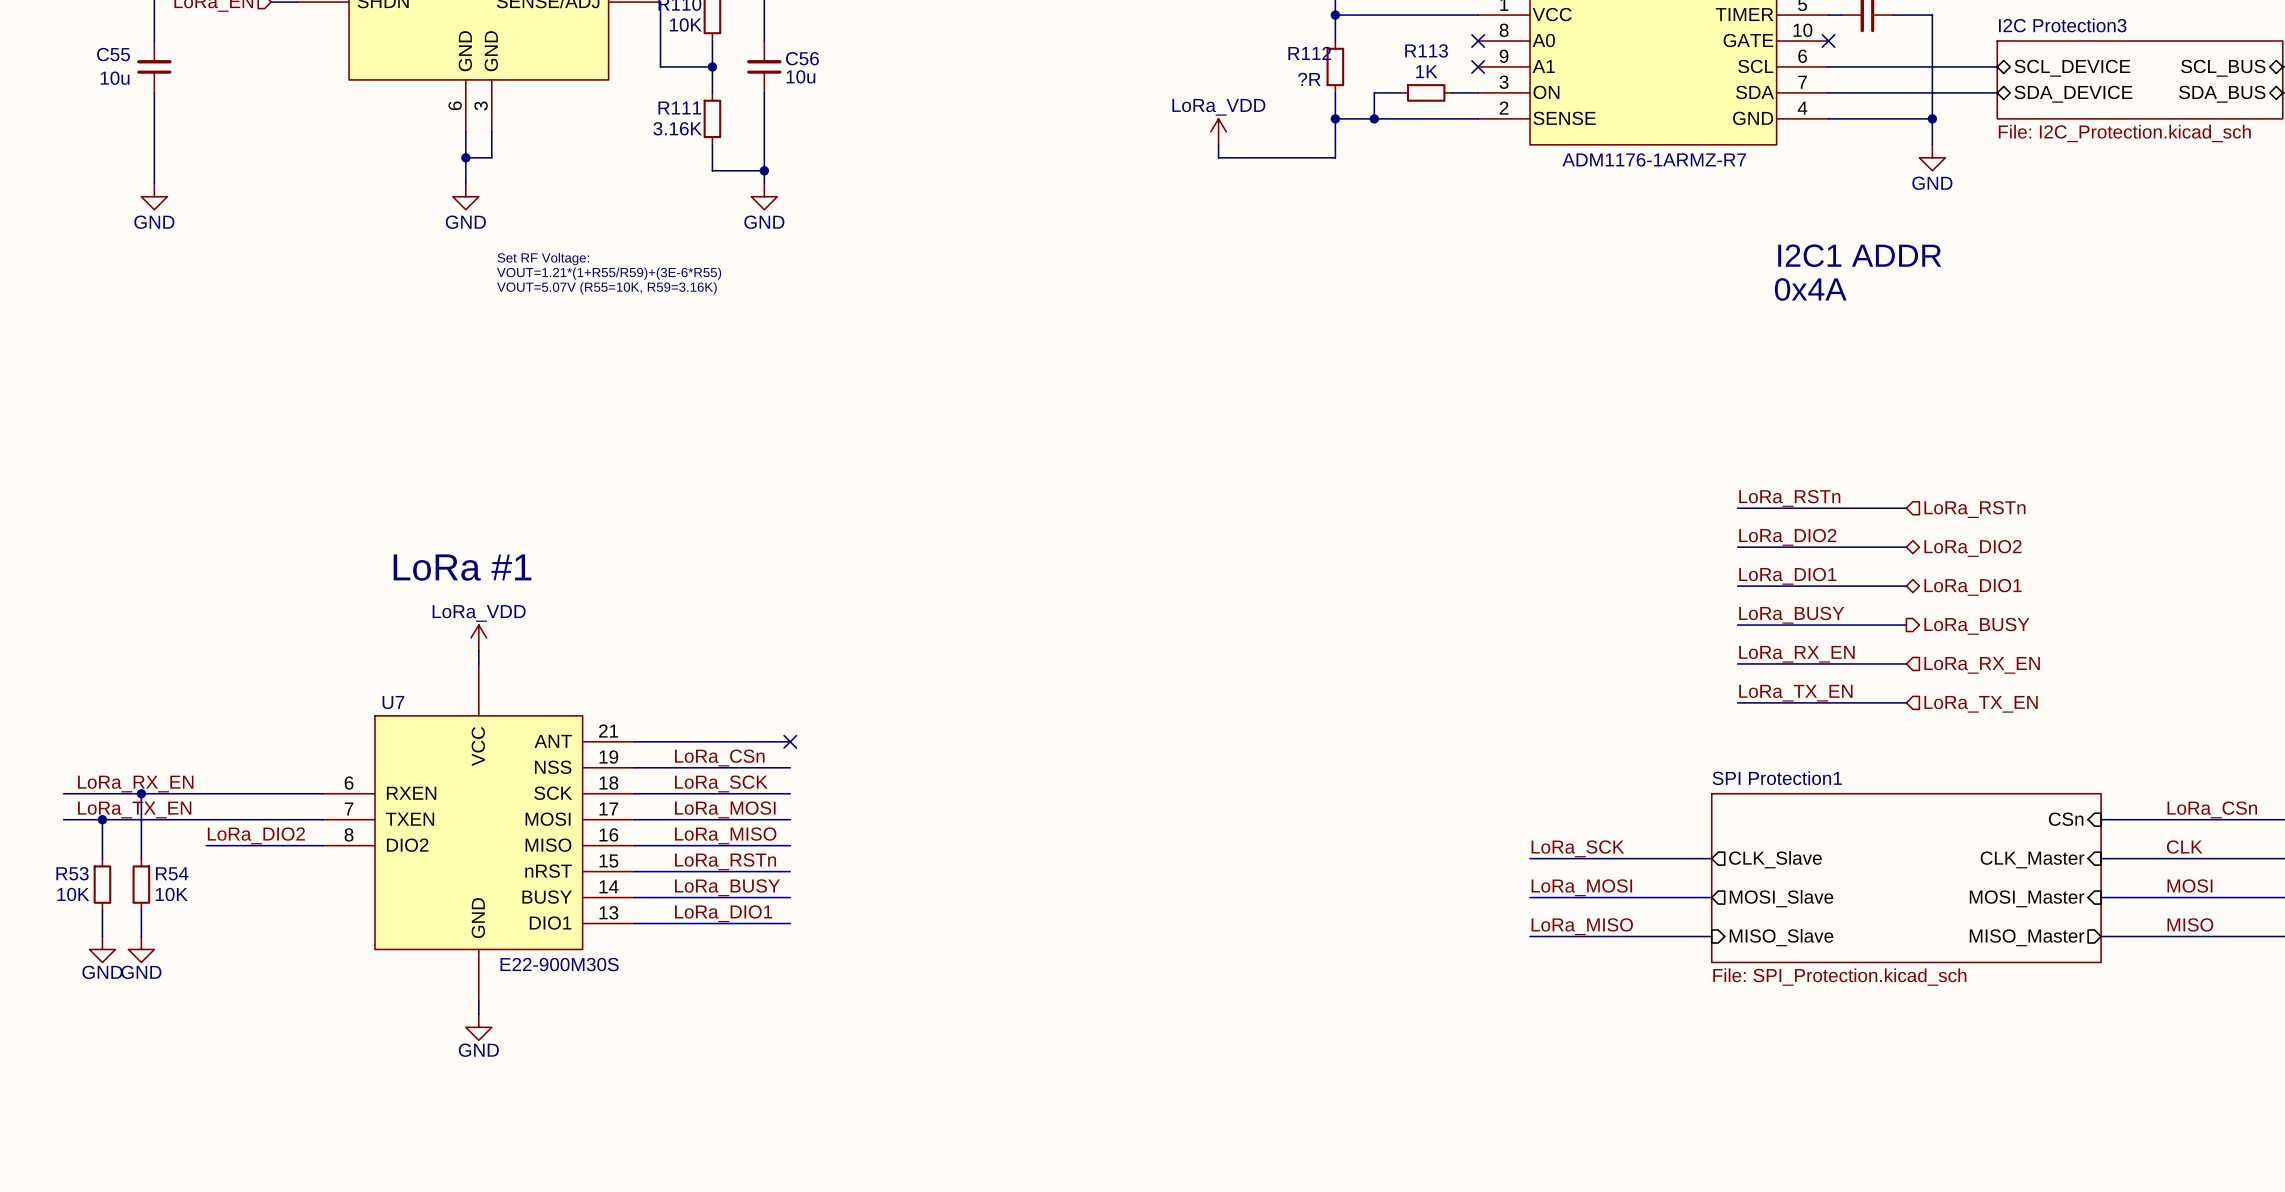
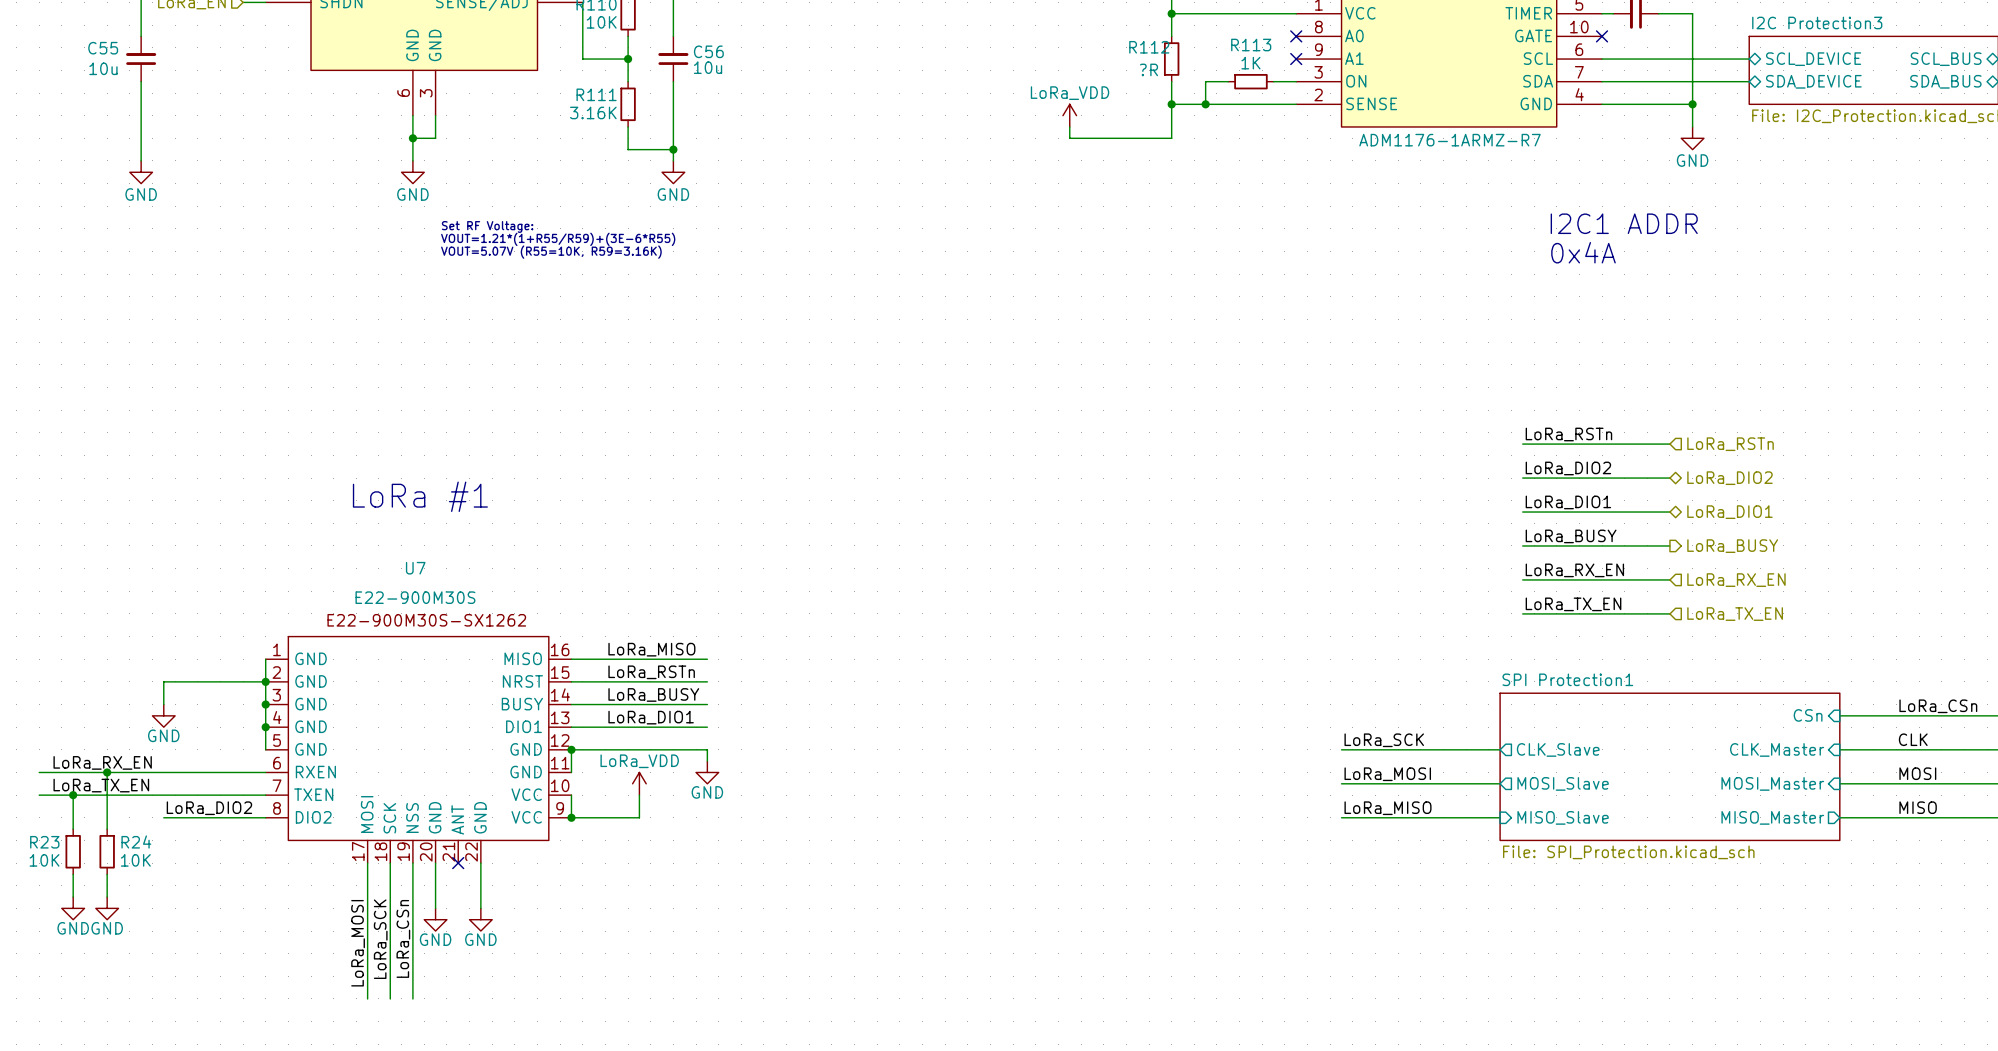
power symbol: LoRa_VDD (478, 638) -> none
wire: (478, 650) (478, 663) -> none
U7 symbol: [323, 663, 635, 1002] -> [265, 636, 572, 864]
U7 name position: U7 (393, 702) -> U7 (415, 568)
wire: (634, 741) (790, 741) -> none
no-connect mark: (790, 741) -> none
wire: none -> (265, 659) (265, 749)
label: LoRa_CSn (719, 757) -> none
wire: (634, 767) (790, 767) -> (571, 659) (707, 659)
wire: none -> (265, 681) (163, 681) (163, 704)
junction: none -> (265, 681)
label: LoRa_SCK (721, 783) -> none
label position: LoRa_RX_EN (135, 784) -> LoRa_RX_EN (102, 762)
wire: (63, 793) (323, 793) -> (39, 772) (265, 772)
wire: (141, 793) (141, 858) -> (107, 772) (107, 829)
junction: (141, 793) -> none
wire: (634, 793) (790, 793) -> (571, 704) (707, 704)
junction: none -> (265, 704)
label position: LoRa_TX_EN (134, 809) -> LoRa_TX_EN (101, 785)
label: LoRa_MOSI (725, 809) -> none
wire: (63, 819) (323, 819) -> (39, 795) (265, 795)
wire: (102, 819) (102, 858) -> (73, 795) (73, 829)
junction: (102, 819) -> none
power symbol: none -> GND (163, 715)
wire: (634, 819) (790, 819) -> (571, 727) (707, 727)
junction: none -> (265, 727)
label position: LoRa_DIO2 (256, 835) -> LoRa_DIO2 (209, 808)
label position: LoRa_MISO (725, 835) -> LoRa_MISO (651, 649)
wire: (206, 845) (323, 845) -> (163, 817) (265, 817)
wire: (634, 845) (790, 845) -> (571, 681) (707, 681)
junction: none -> (571, 749)
label position: LoRa_RSTn (725, 861) -> LoRa_RSTn (651, 672)
wire: (634, 871) (790, 871) -> none
wire: none -> (707, 761) (707, 749) (571, 749) (571, 772)
R53: 10K (102, 884) -> none
junction: none -> (107, 772)
R54: 10K (141, 884) -> none
power symbol: none -> GND (707, 772)
label position: LoRa_BUSY (727, 887) -> LoRa_BUSY (653, 694)
wire: (634, 897) (790, 897) -> none
power symbol: none -> LoRa_VDD (639, 783)
junction: none -> (73, 795)
wire: (102, 910) (102, 936) -> (73, 874) (73, 897)
wire: (141, 910) (141, 936) -> (107, 874) (107, 897)
wire: none -> (571, 795) (571, 817) (639, 817) (639, 795)
label position: LoRa_DIO1 (723, 913) -> LoRa_DIO1 (651, 717)
wire: (634, 923) (790, 923) -> none
junction: none -> (571, 817)
power symbol: GND (102, 949) -> none
power symbol: GND (141, 949) -> none
U7 value position: E22-900M30S (559, 964) -> E22-900M30S (415, 597)
R23: none -> 10K (73, 851)
R24: none -> 10K (107, 851)
wire: none -> (367, 863) (367, 998)
wire: none -> (390, 863) (390, 998)
wire: none -> (412, 863) (412, 998)
wire: none -> (435, 863) (435, 908)
no-connect mark: none -> (458, 863)
wire: none -> (480, 863) (480, 908)
wire: (478, 1001) (478, 1014) -> none
power symbol position: GND (478, 1027) -> GND (435, 919)
power symbol: none -> GND (73, 908)
power symbol: none -> GND (107, 908)
power symbol: none -> GND (480, 919)
label: none -> LoRa_SCK (380, 939)
label: none -> LoRa_CSn (403, 938)
label: none -> LoRa_MOSI (358, 943)

